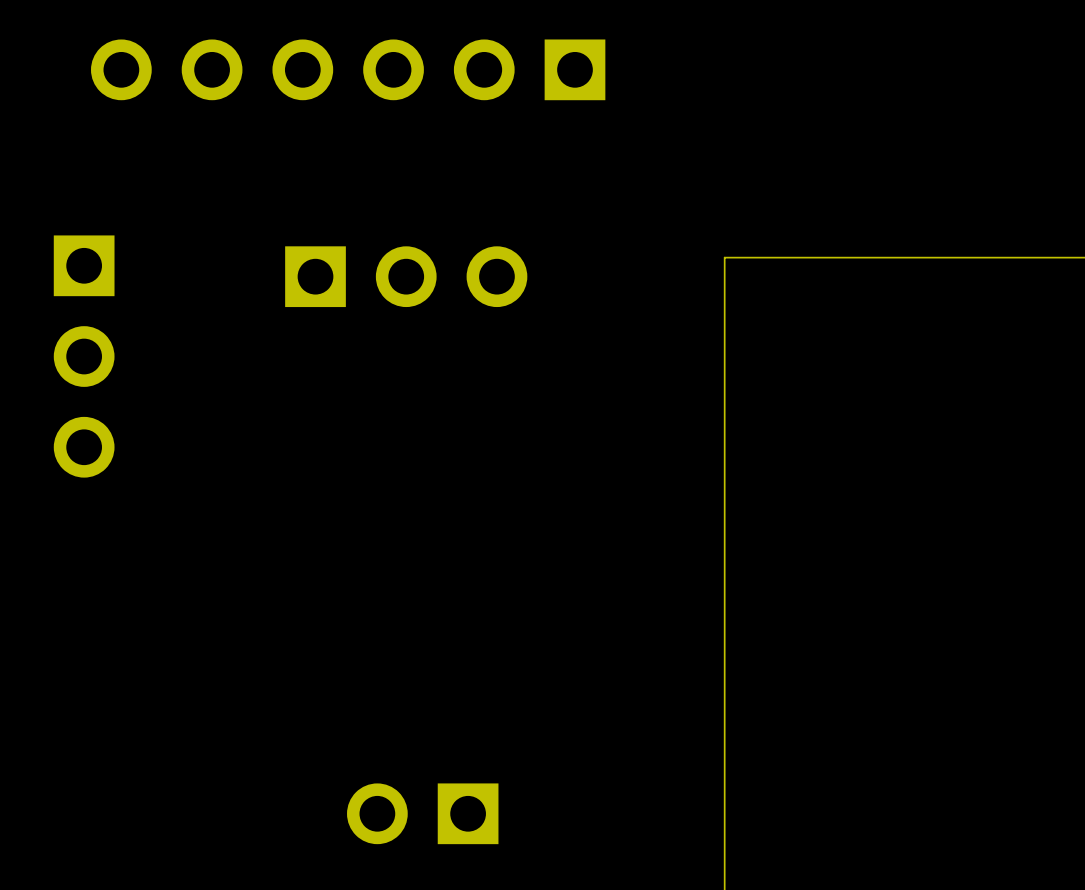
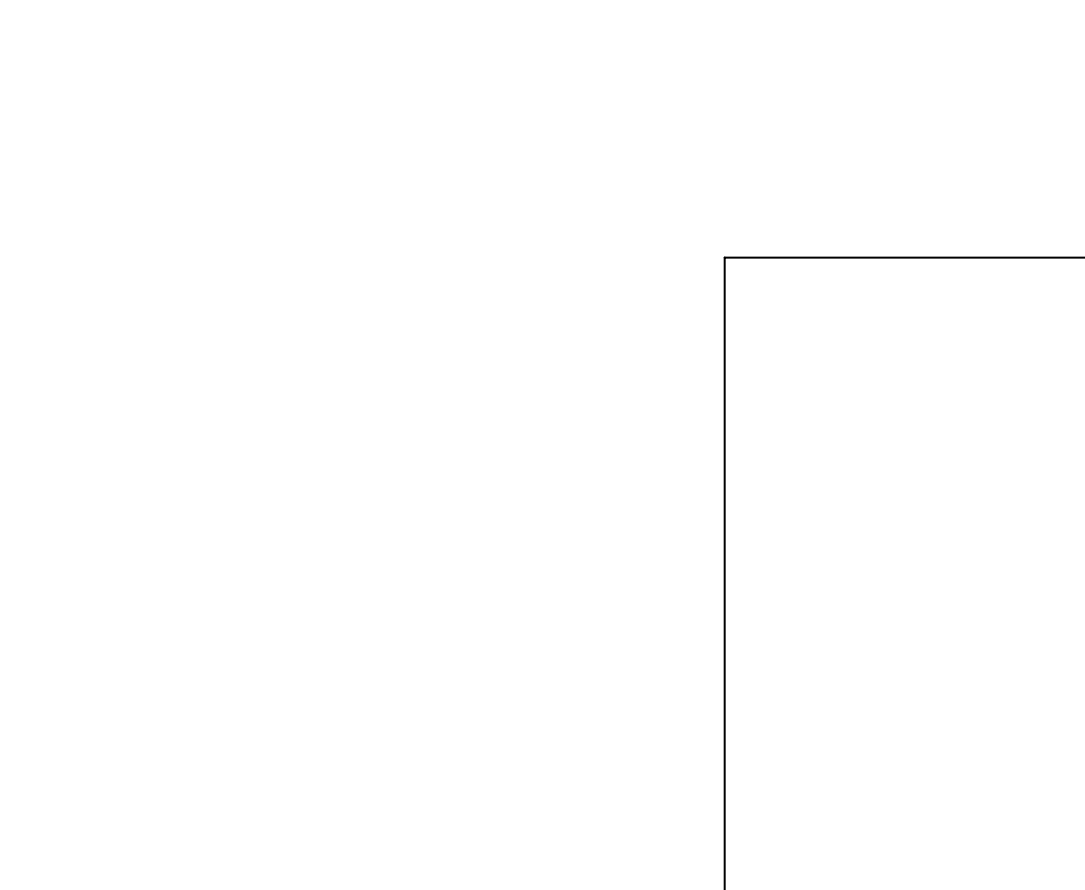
part: (348, 69) -> none
part: (406, 276) -> none
part: (84, 356) -> none
part: (422, 813) -> none

